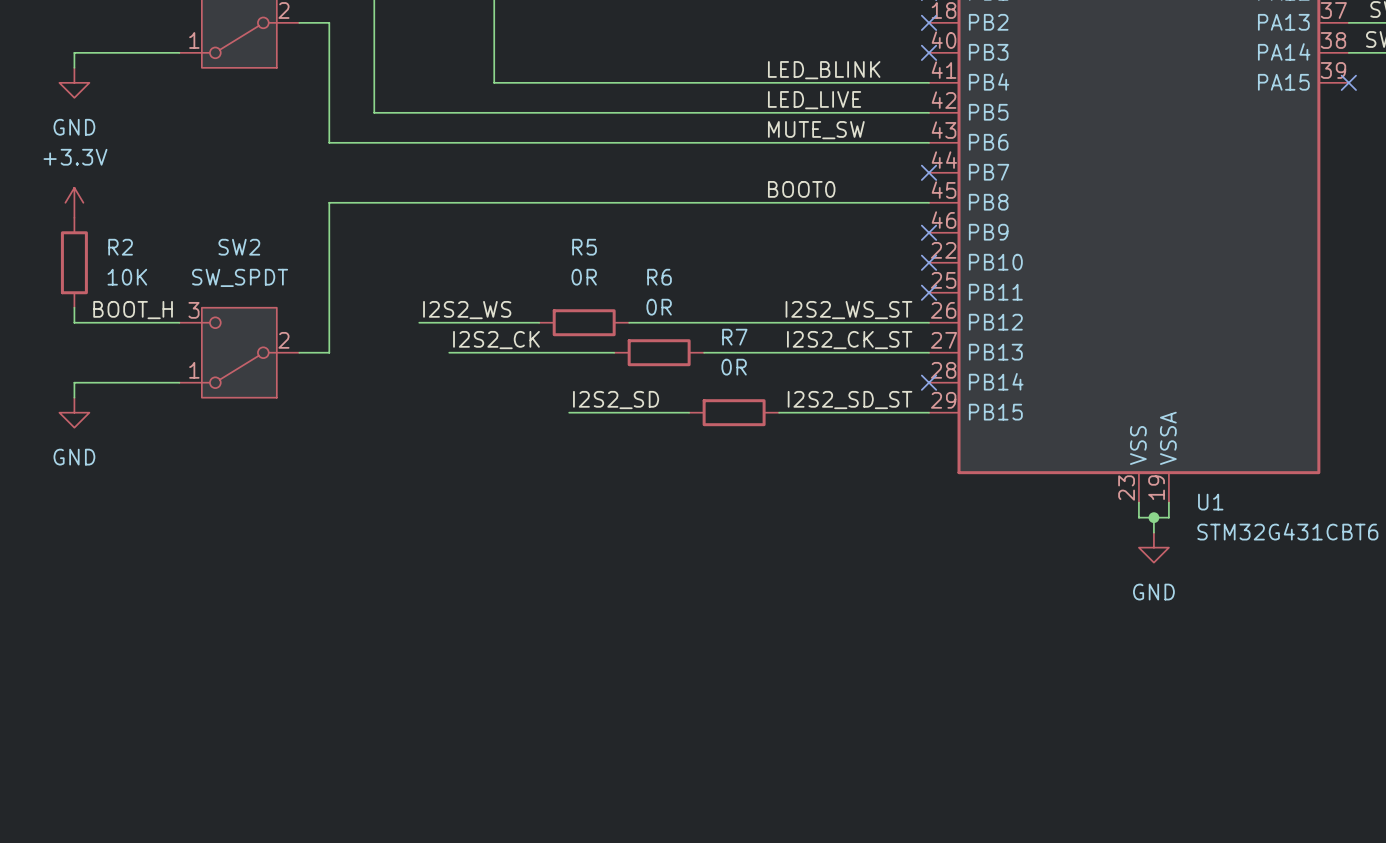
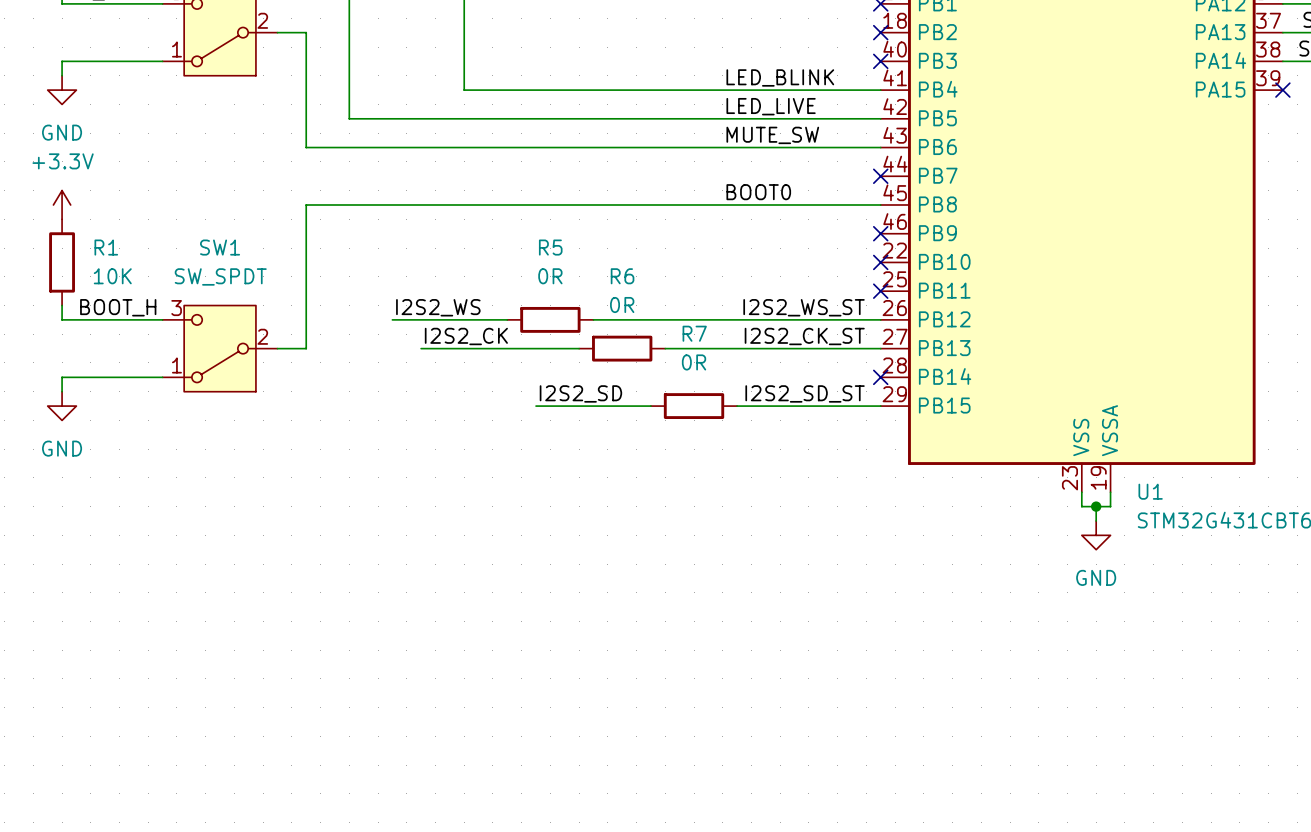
R2 name: R2 (120, 247) -> R1 (106, 247)
SW2 name: SW2 (239, 247) -> SW1 (220, 247)

